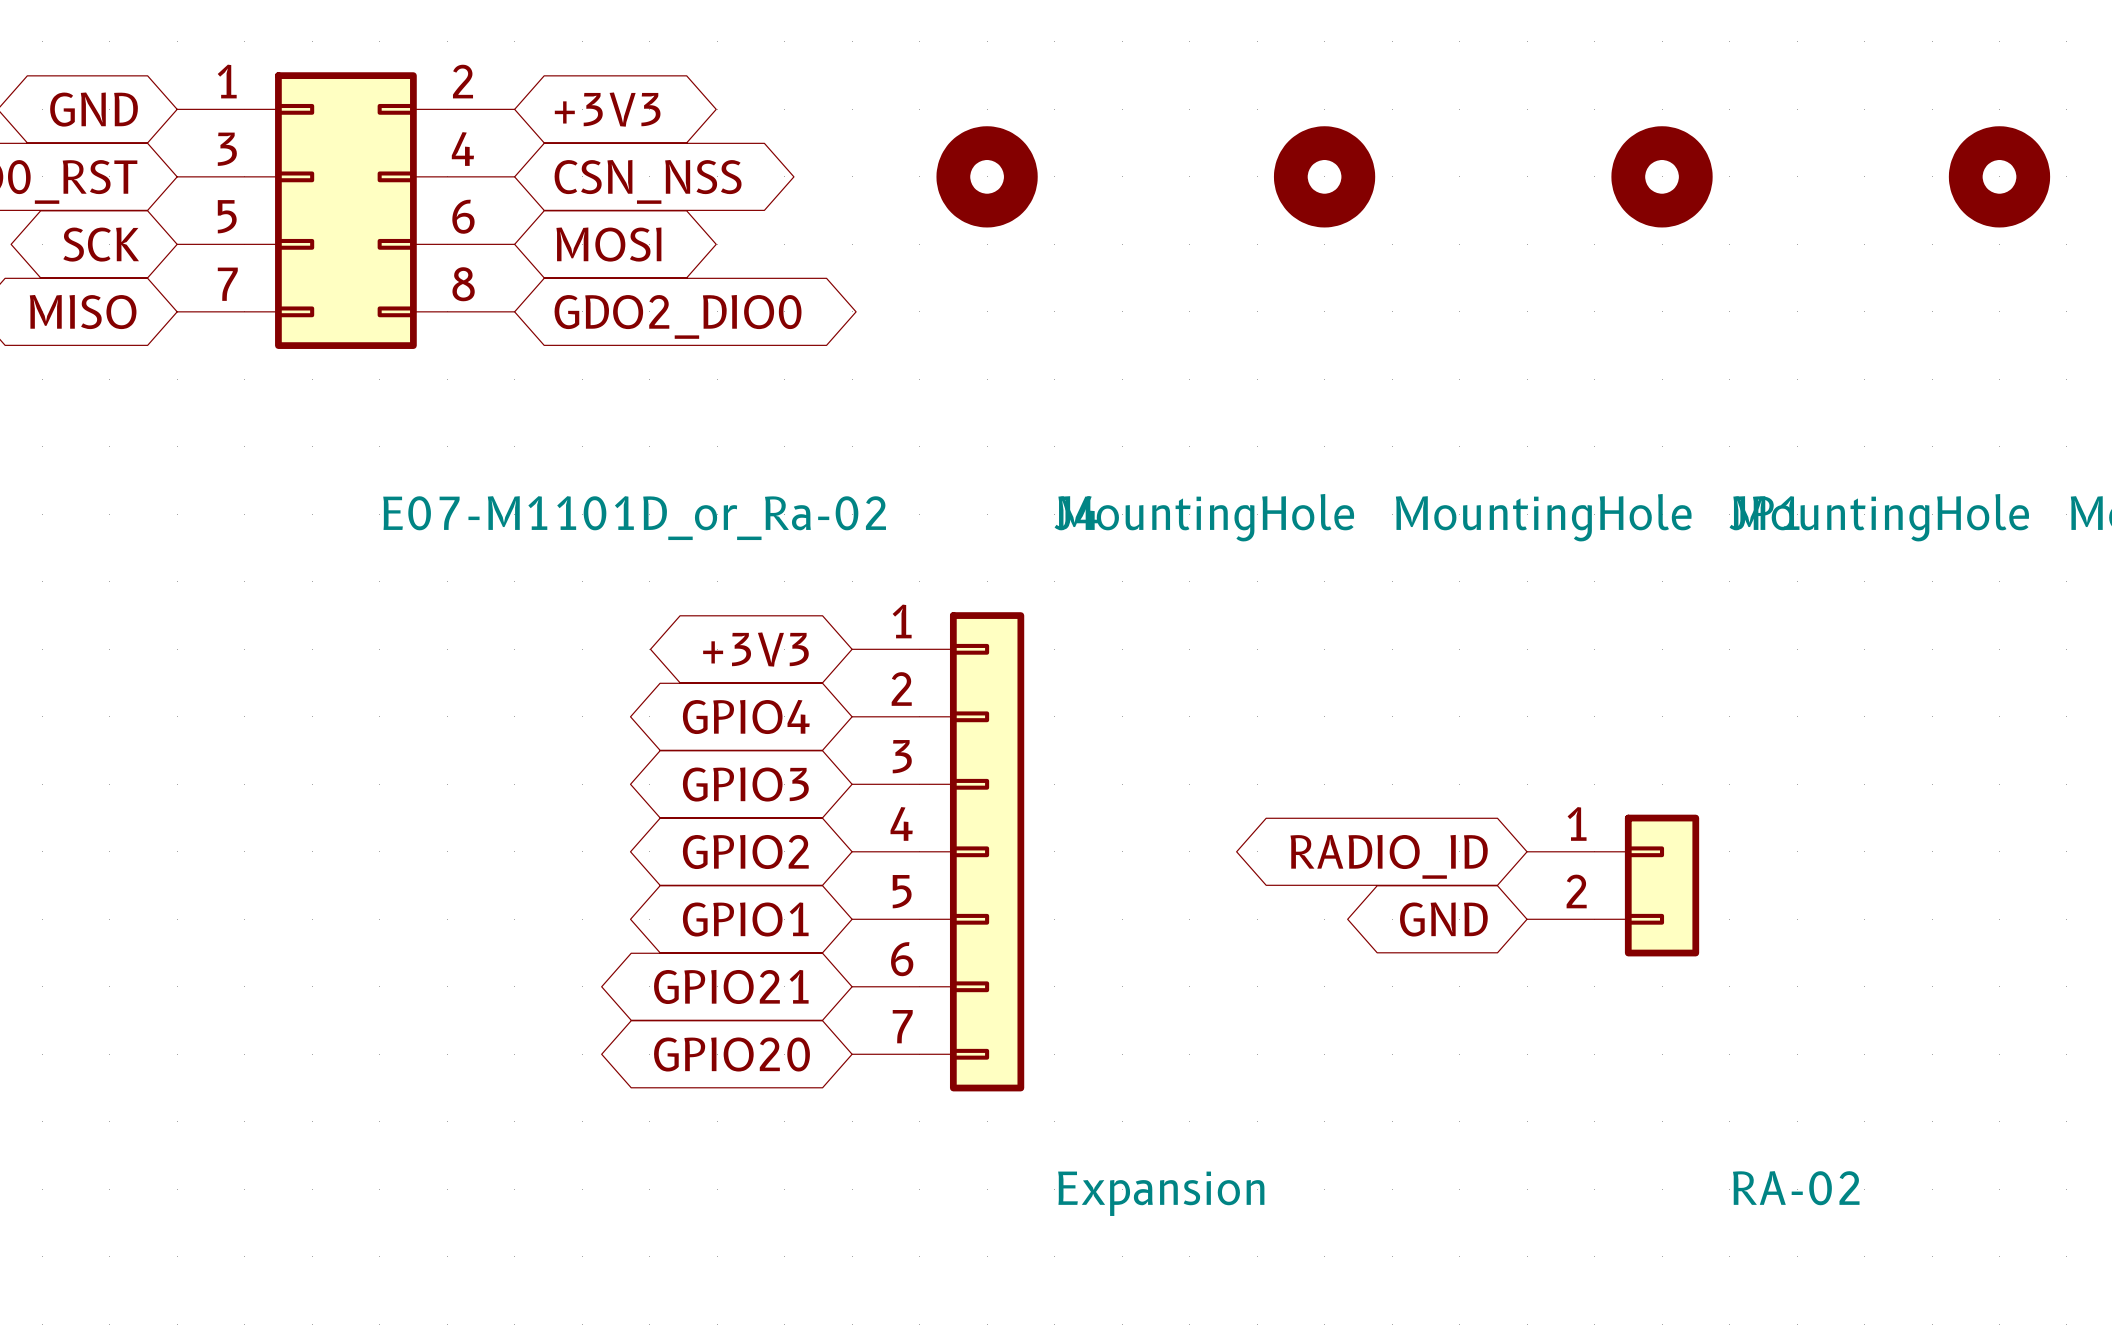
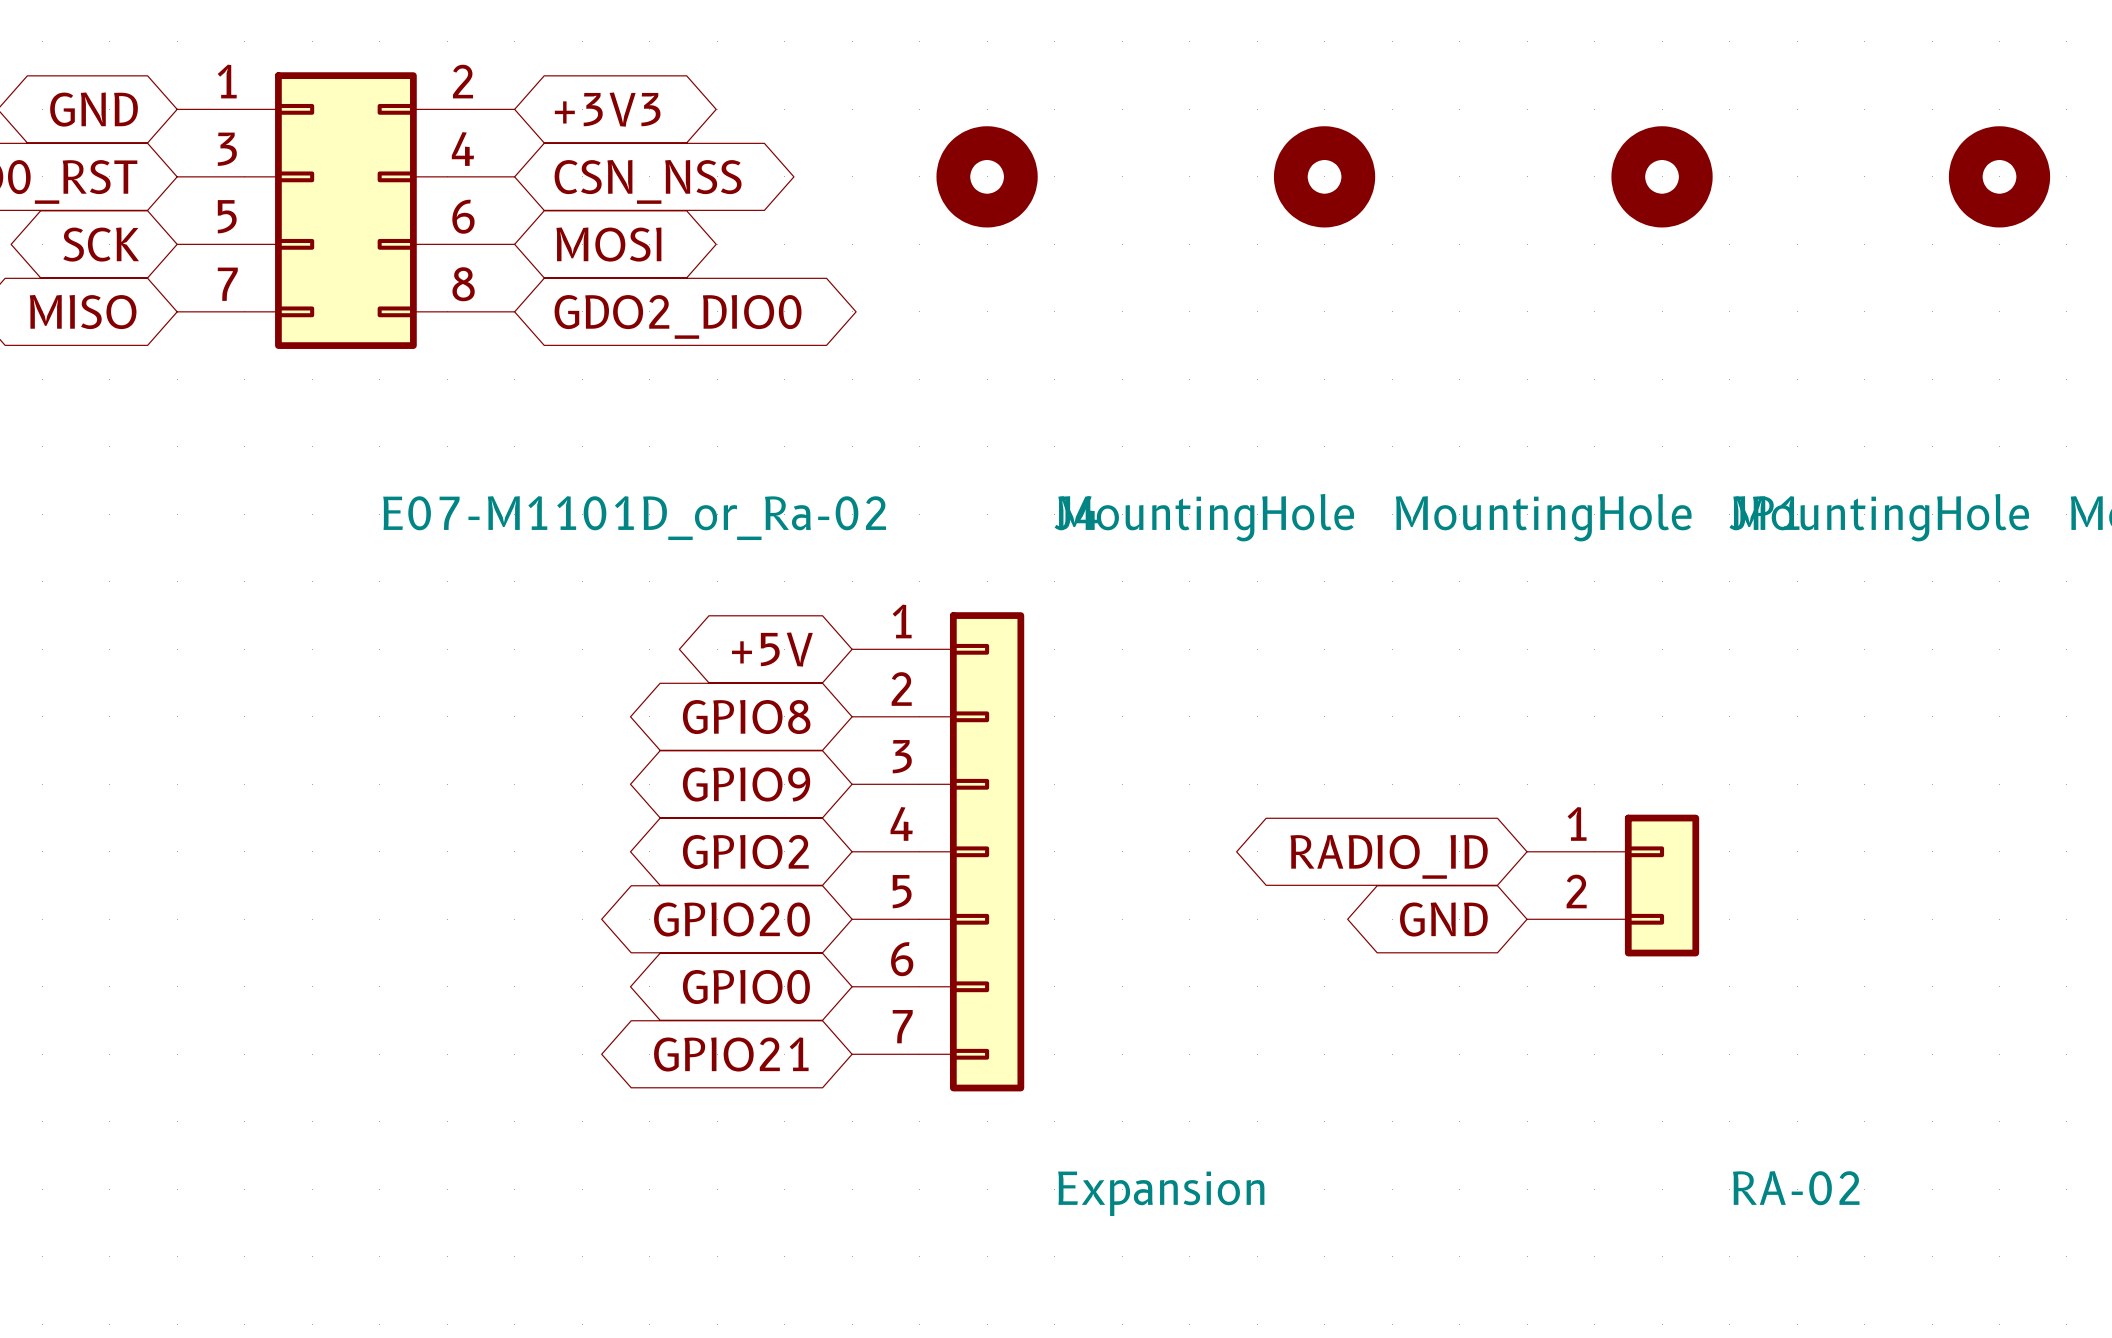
global label: +3V3 (755, 649) -> +5V (772, 649)
global label: GPIO4 (746, 716) -> GPIO8 (746, 716)
global label: GPIO3 (745, 784) -> GPIO9 (746, 784)
global label: GPIO1 (745, 919) -> GPIO20 (731, 919)
global label: GPIO21 (731, 986) -> GPIO0 (746, 986)
global label: GPIO20 (731, 1054) -> GPIO21 (731, 1054)

